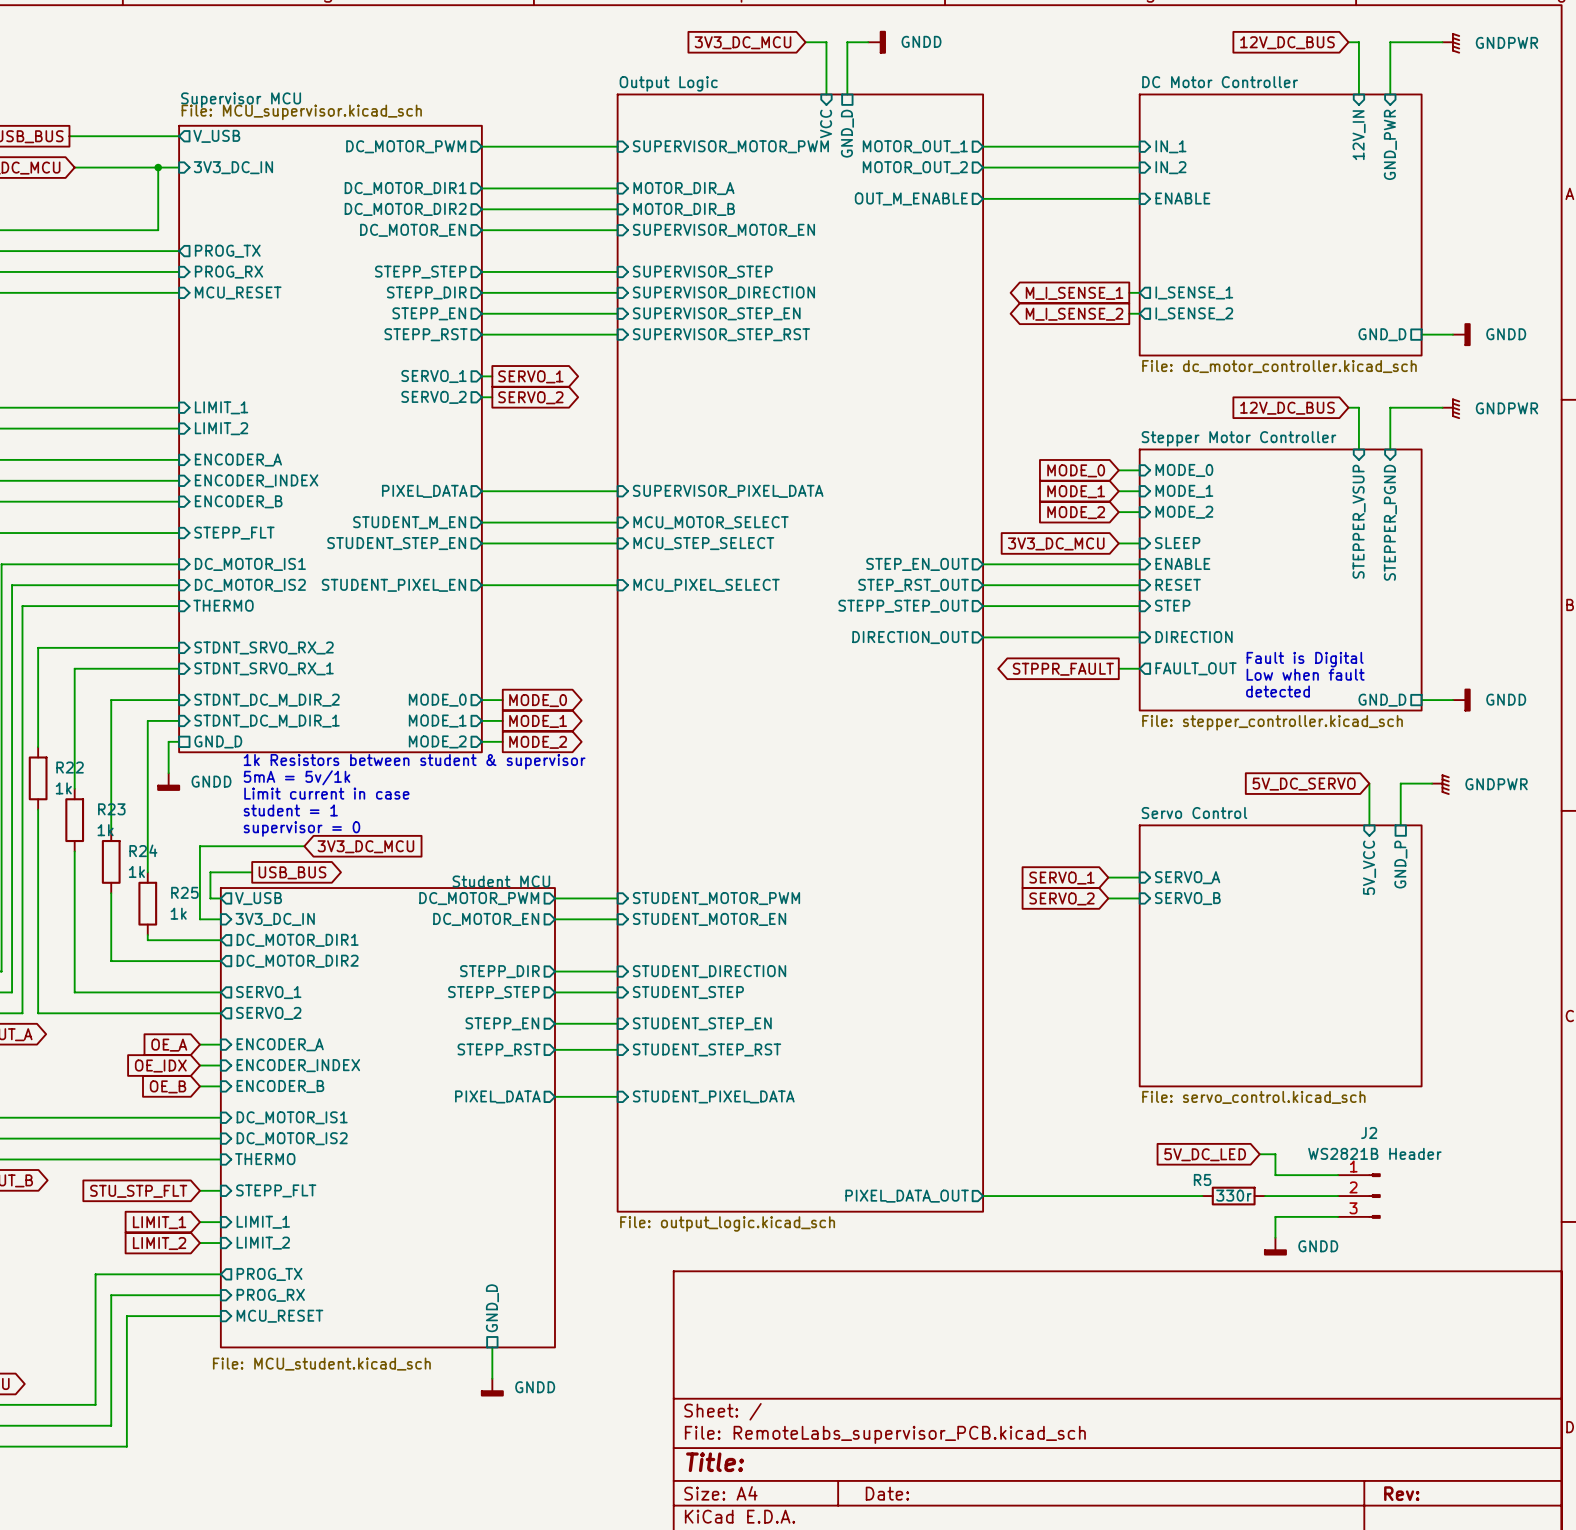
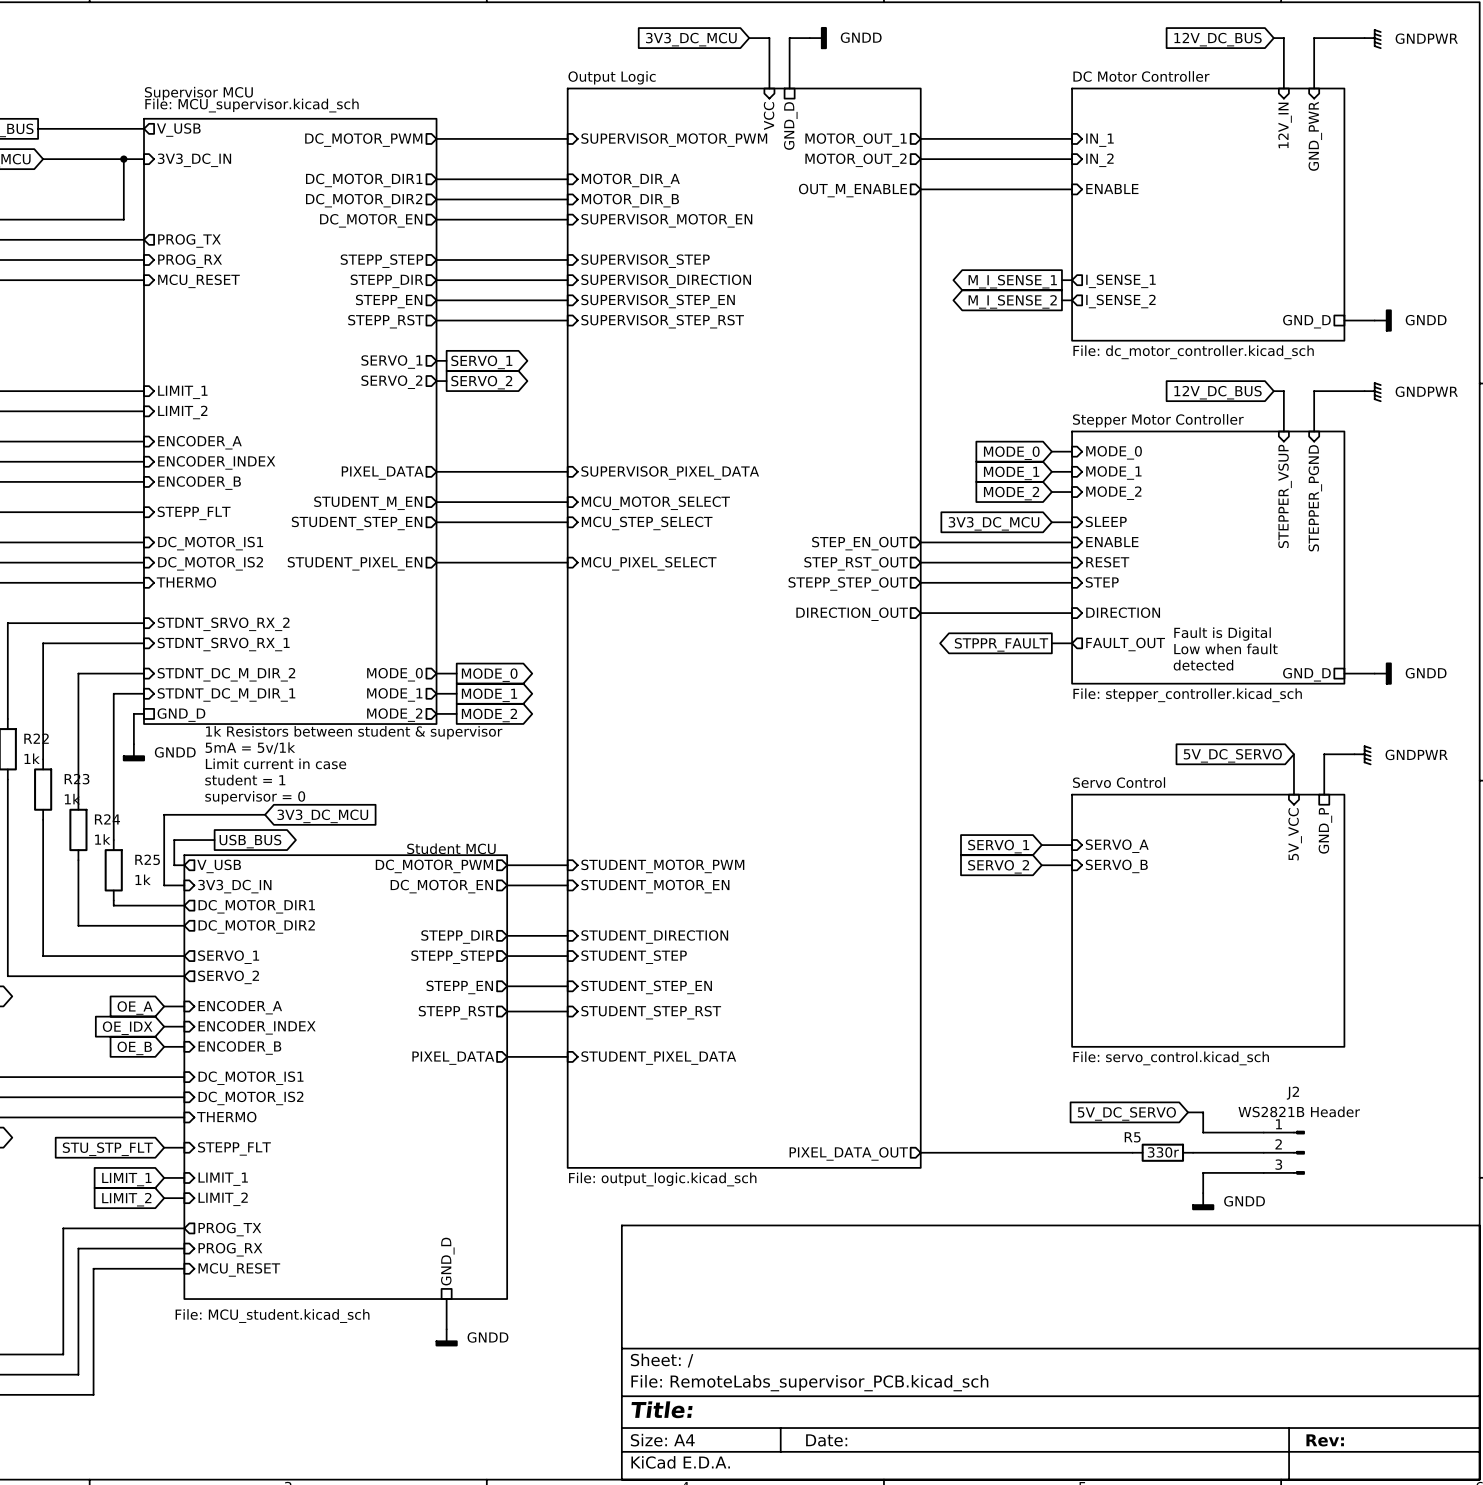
global label: 5V_DC_LED (1205, 1154) -> 5V_DC_SERVO (1126, 1113)

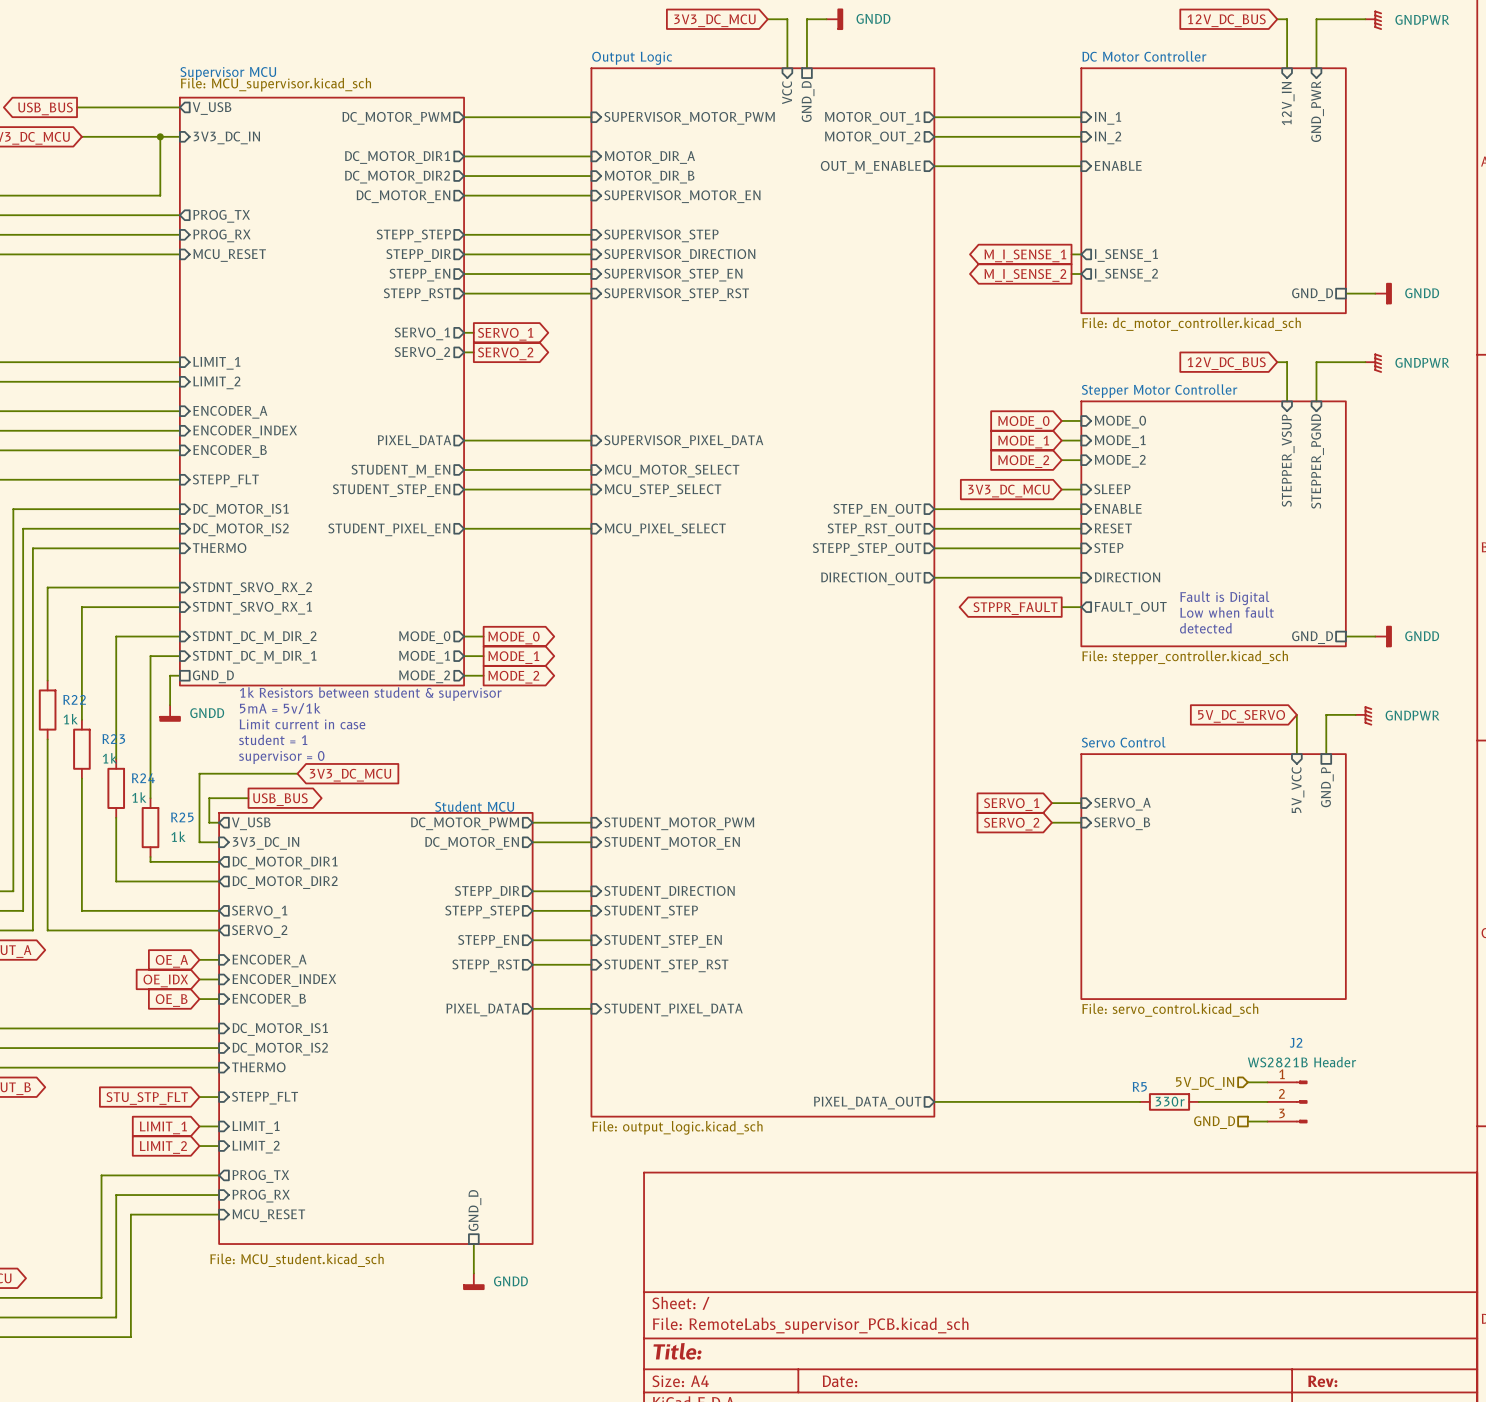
wire: (1188, 1112) (1203, 1112) (1203, 1132) (1243, 1132) -> none
global label: 5V_DC_SERVO (1126, 1113) -> none
hierarchical label: none -> 5V_DC_IN (1205, 1083)
wire: (1243, 1172) (1203, 1172) (1203, 1193) -> none
hierarchical label: none -> GND_D (1214, 1122)
power symbol: GNDD (1203, 1201) -> none

